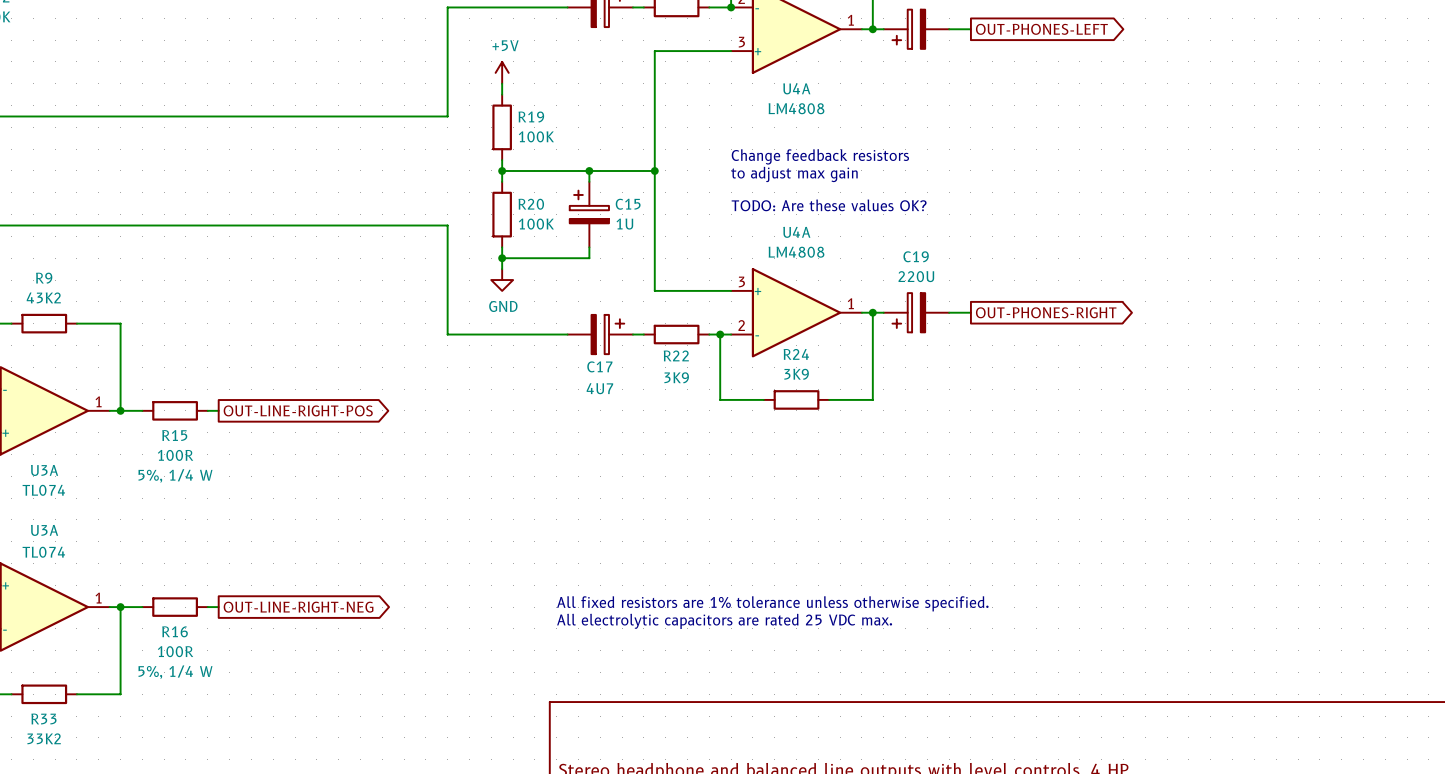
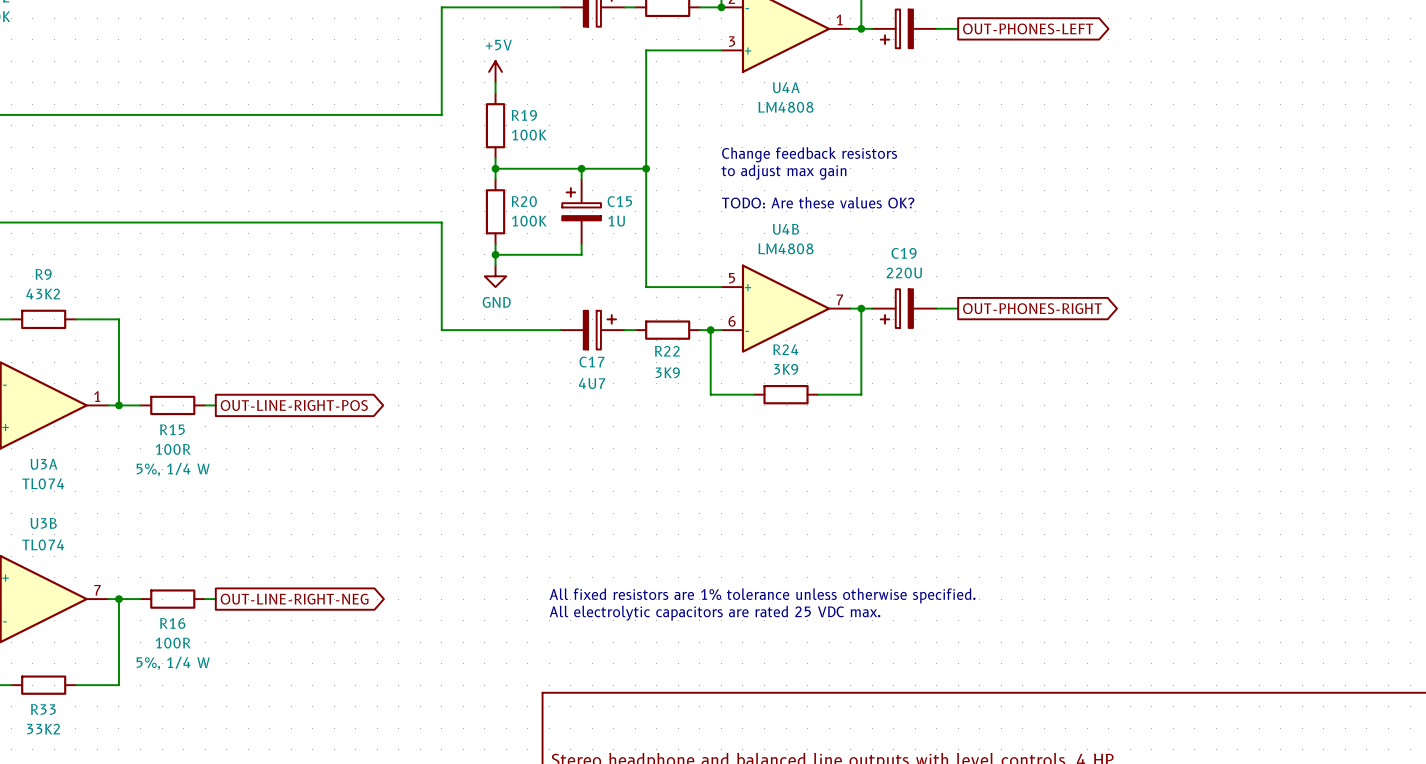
U4A name: U4A (796, 232) -> U4B (785, 229)
U4A pin number: 3 (741, 282) -> 5 (732, 278)
U4A pin number: 1 (850, 303) -> 7 (839, 299)
U4A pin number: 2 (741, 325) -> 6 (732, 321)
U3A name: U3A (44, 530) -> U3B (43, 523)
U3A pin number: 1 (98, 598) -> 7 (97, 590)

